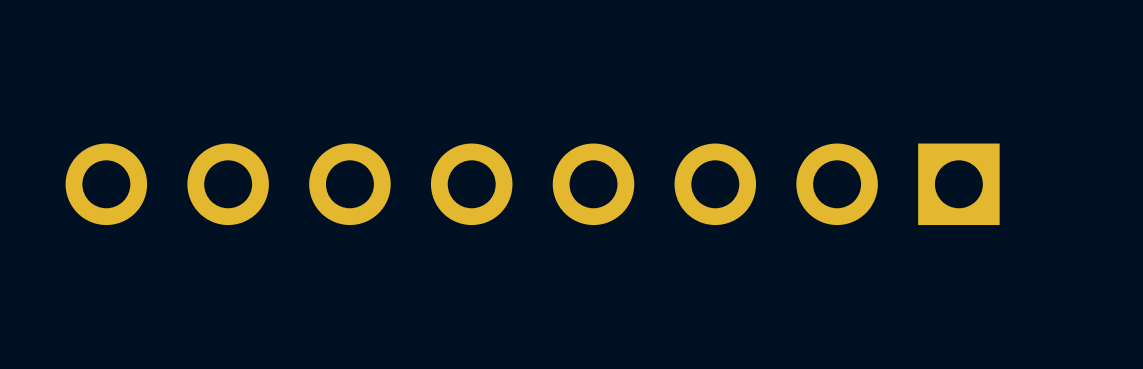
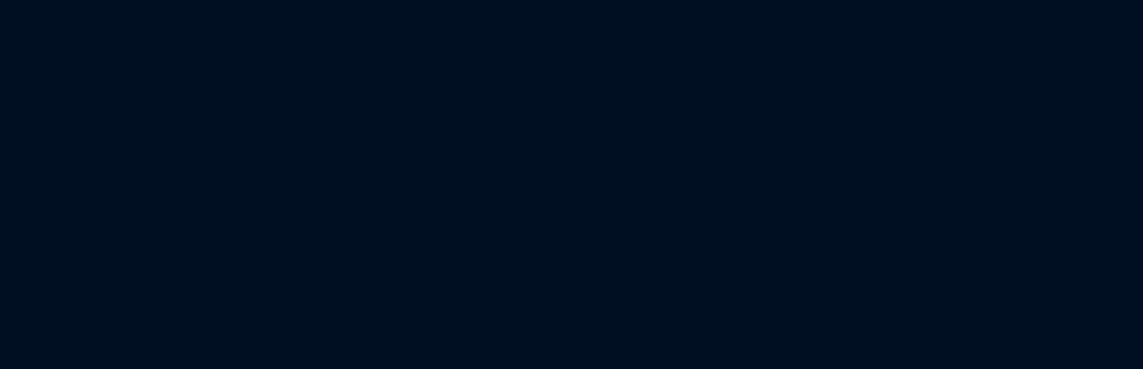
part: (532, 184) -> none

